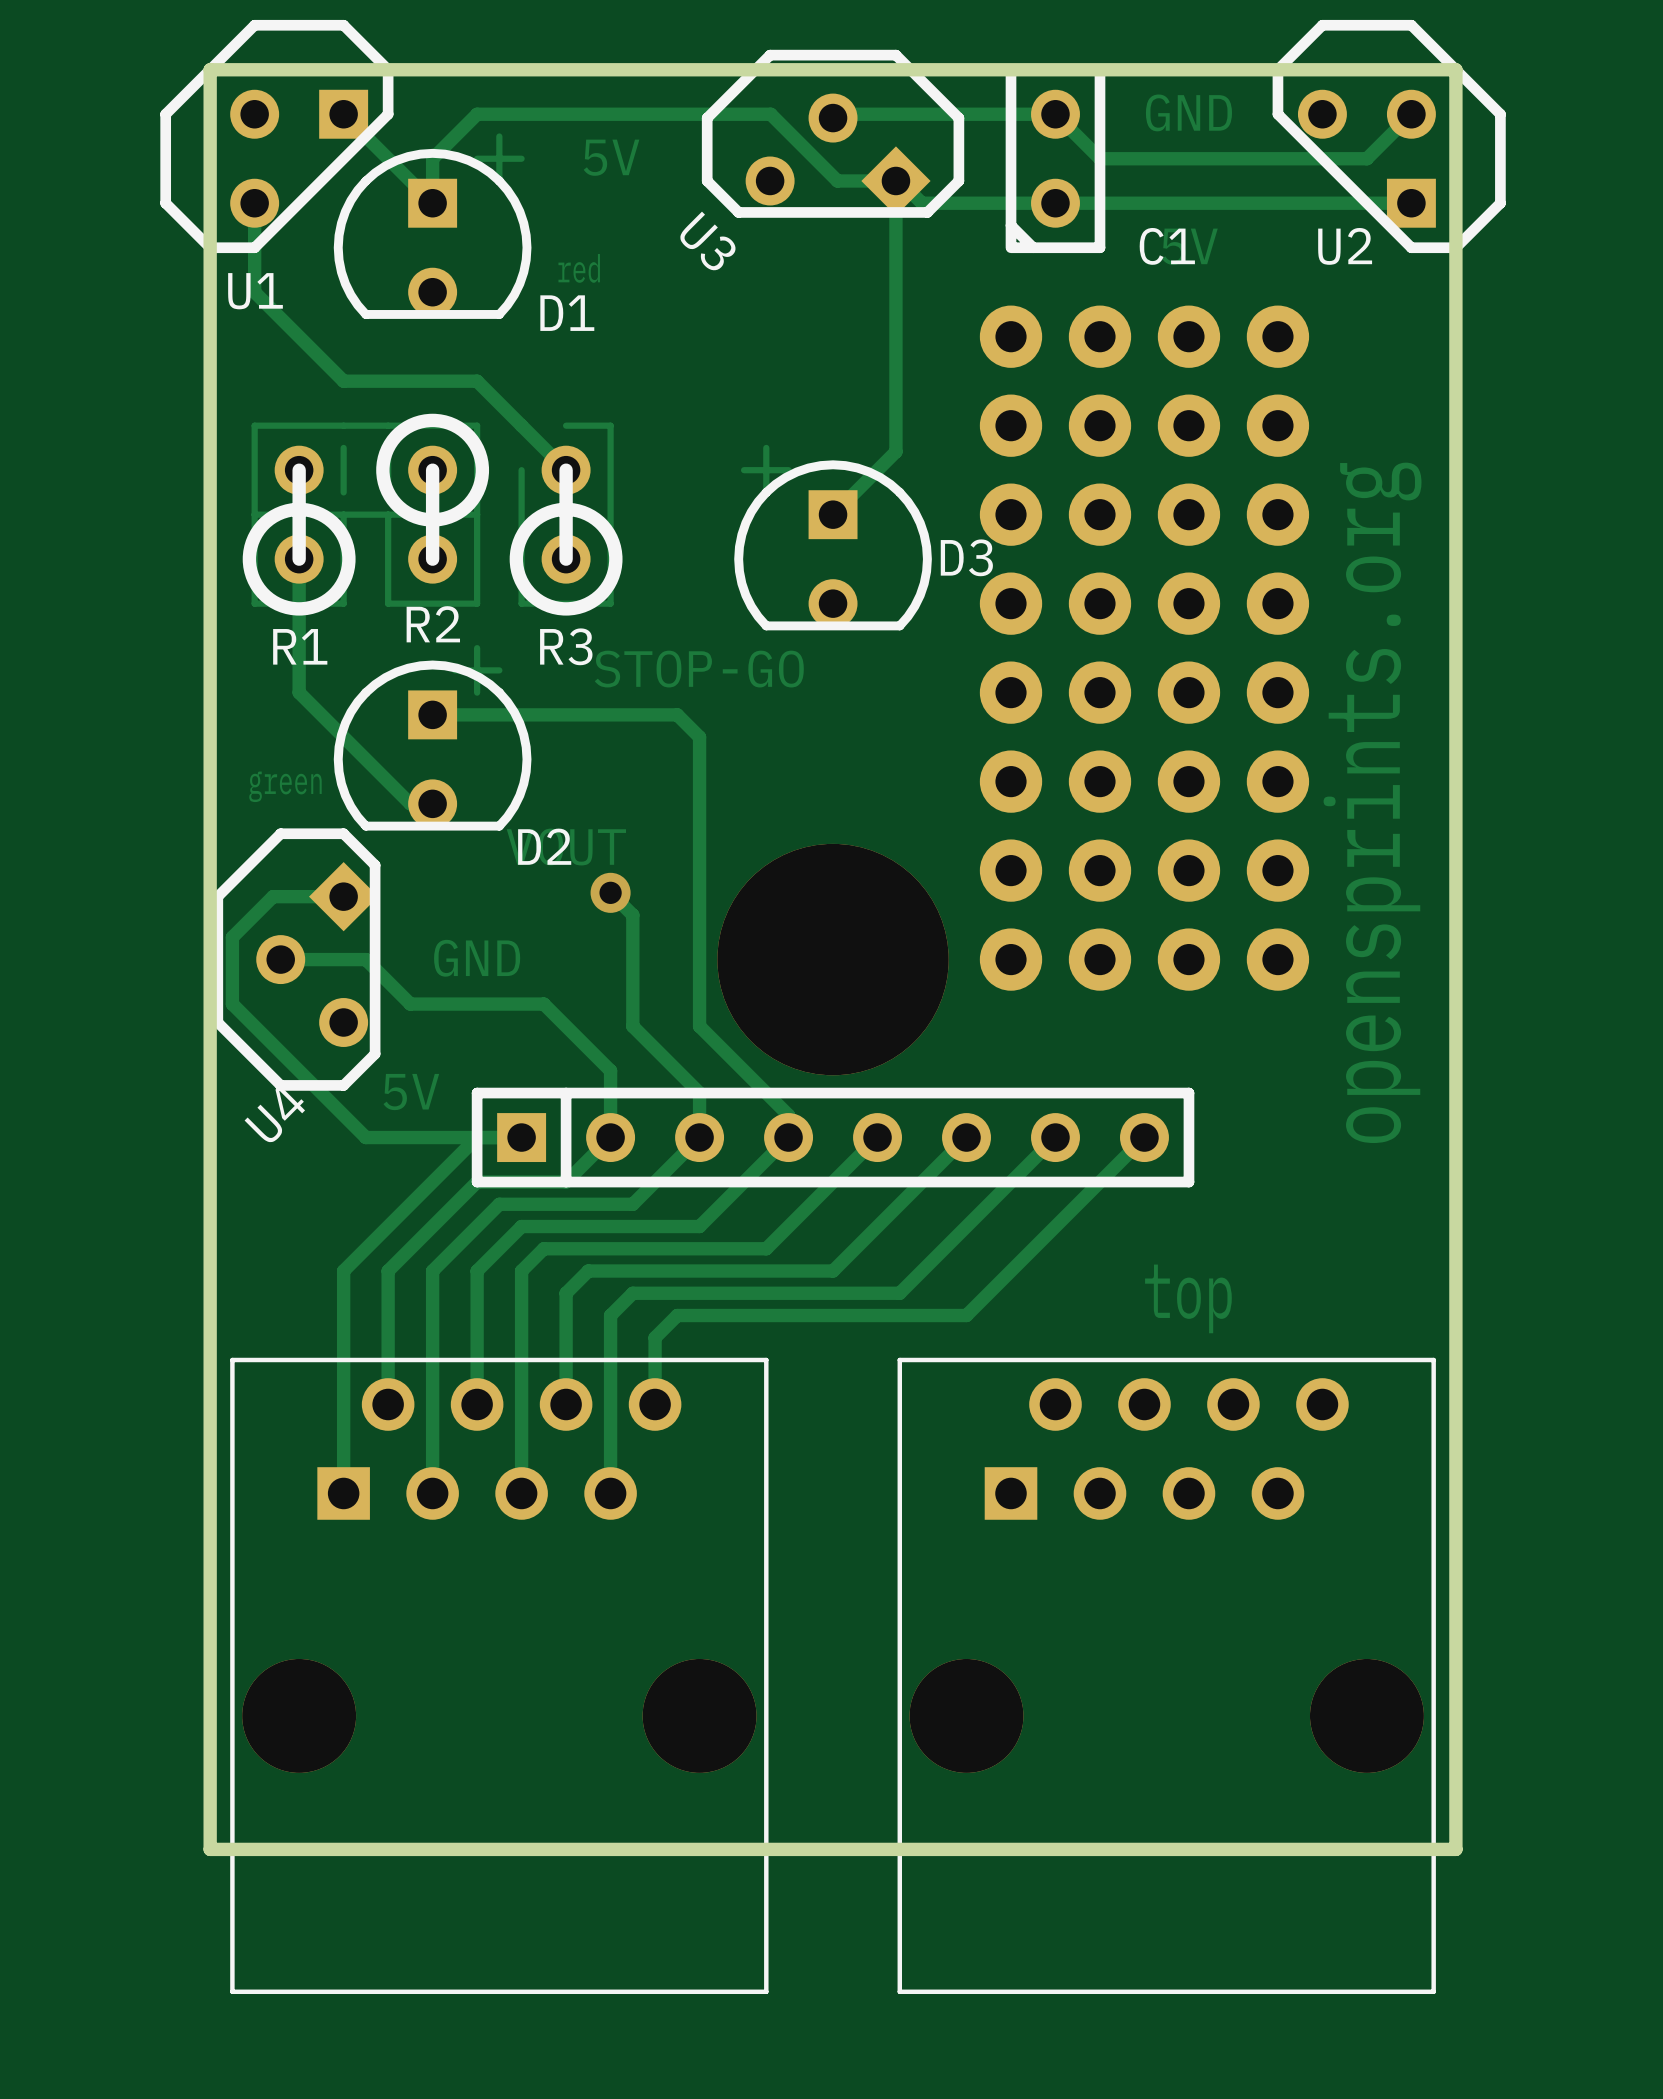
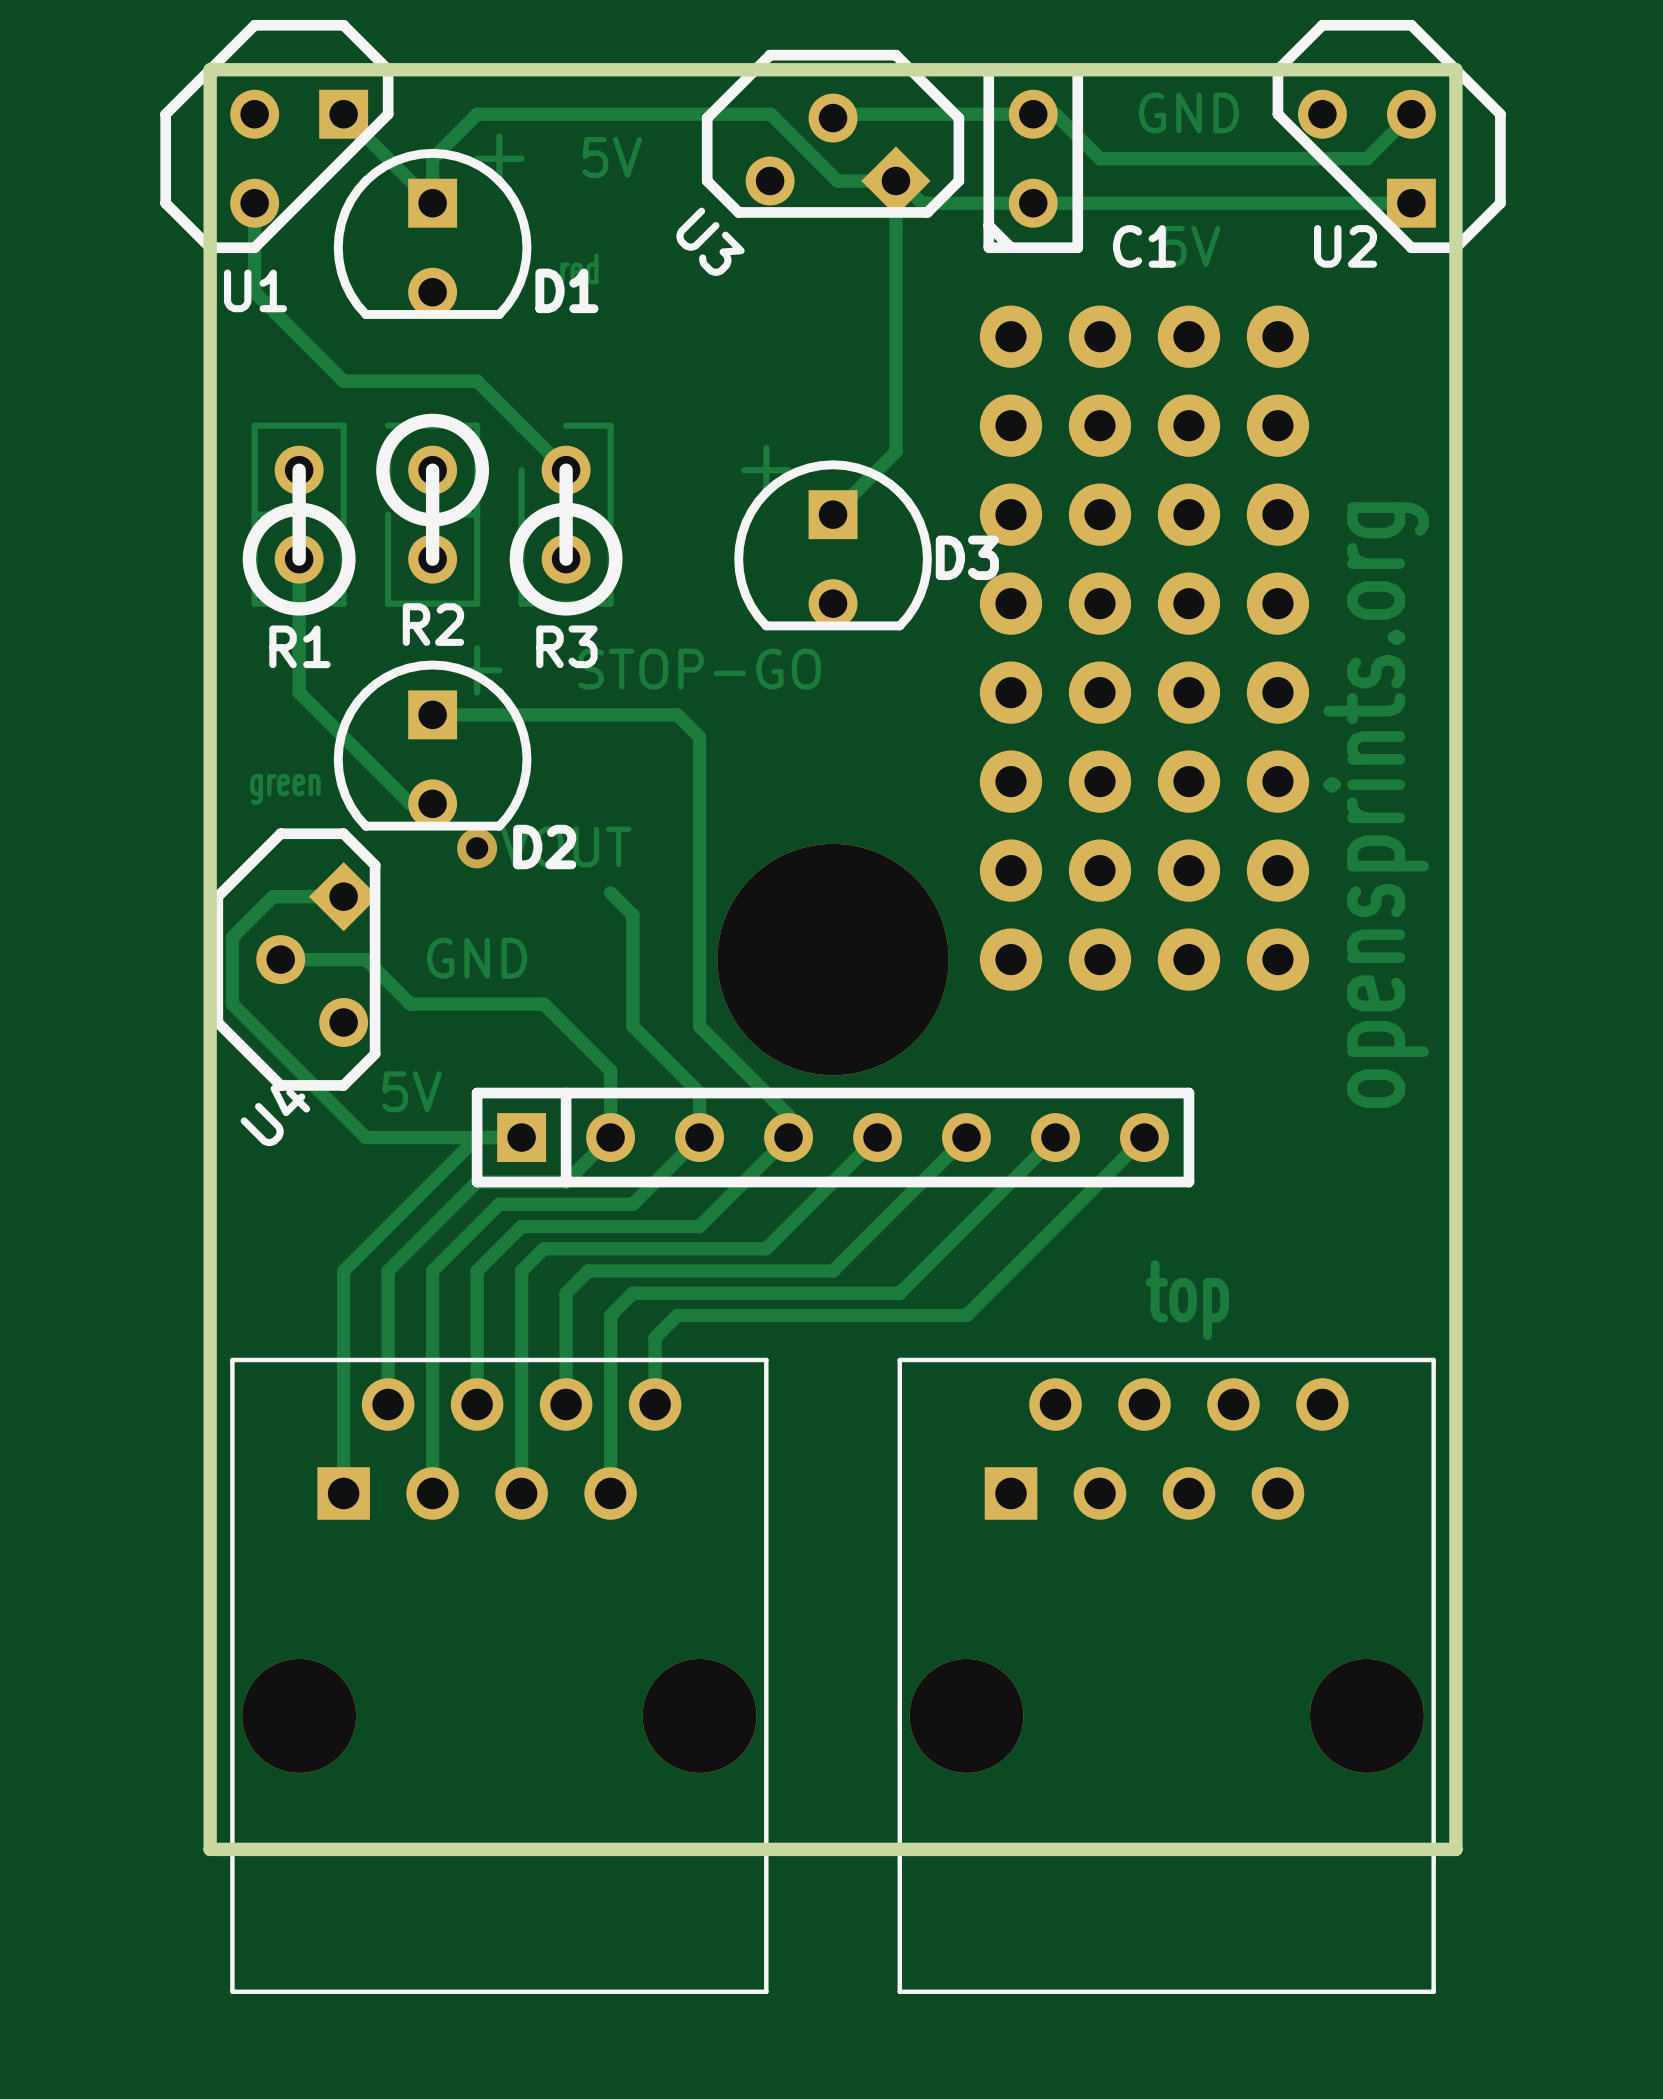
C1 position: (1055, 158) -> (1033, 158)
D1 name position: D1 (567, 313) -> D1 (566, 290)
track: (343, 425) (388, 425) -> (343, 425) (343, 447)
track: none -> (343, 492) (343, 514)
track: (321, 514) (410, 514) -> none
via position: (610, 892) -> (477, 848)

